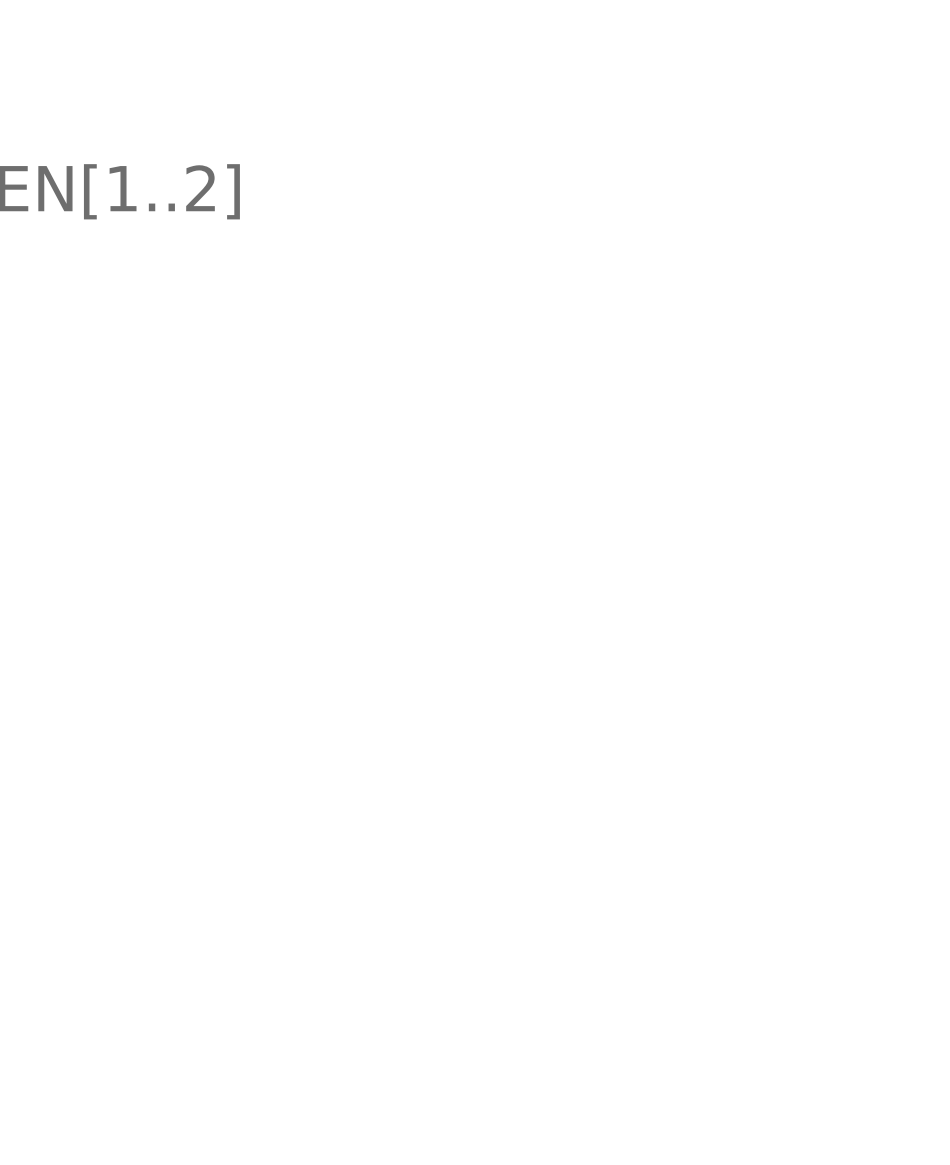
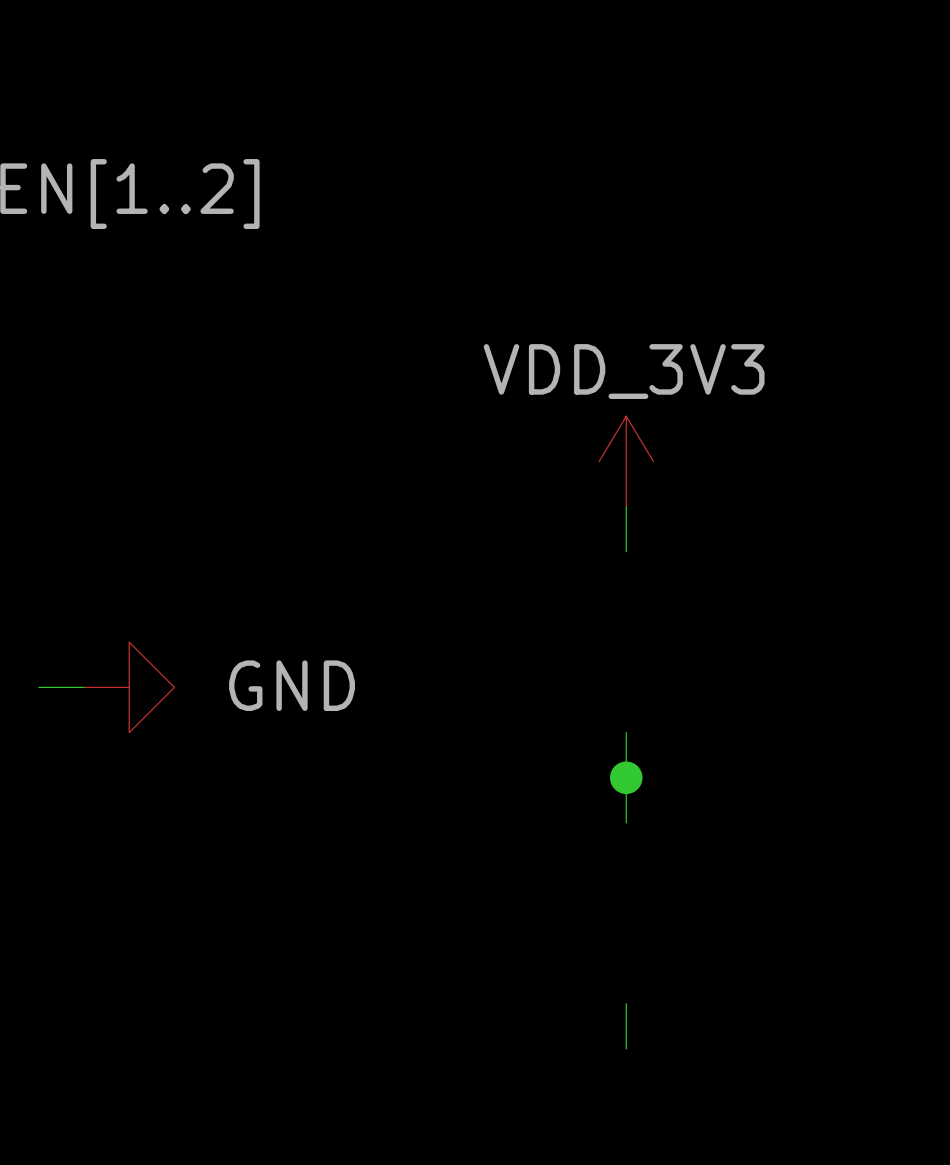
power symbol: none -> VDD_3V3 (626, 461)
wire: none -> (626, 506) (626, 551)
wire: none -> (38, 687) (84, 687)
power symbol: none -> GND (129, 687)
wire: none -> (626, 732) (626, 822)
junction: none -> (626, 777)
wire: none -> (626, 1003) (626, 1048)

